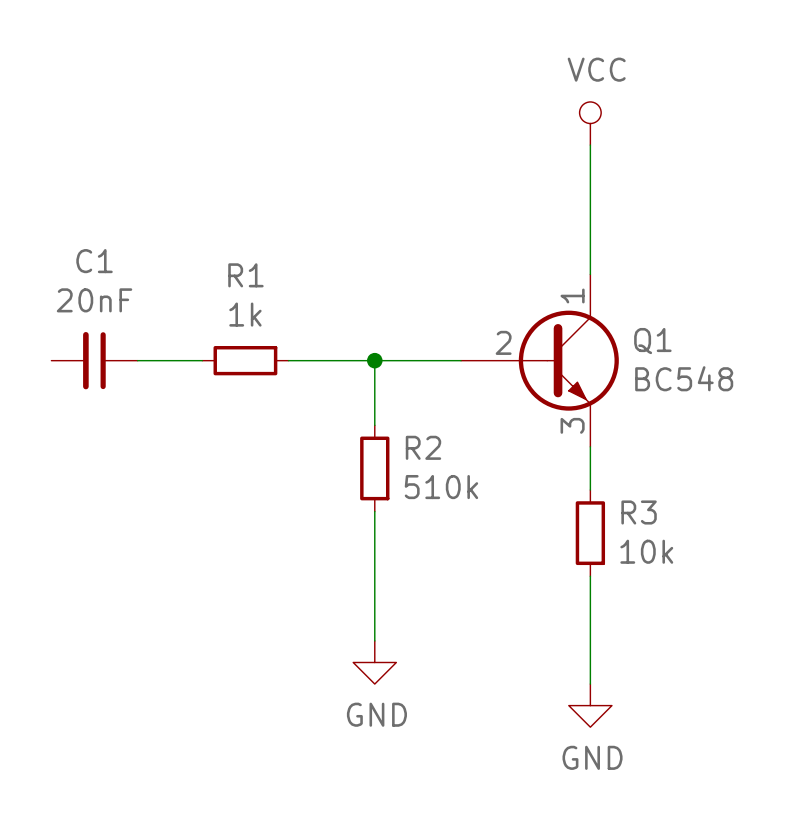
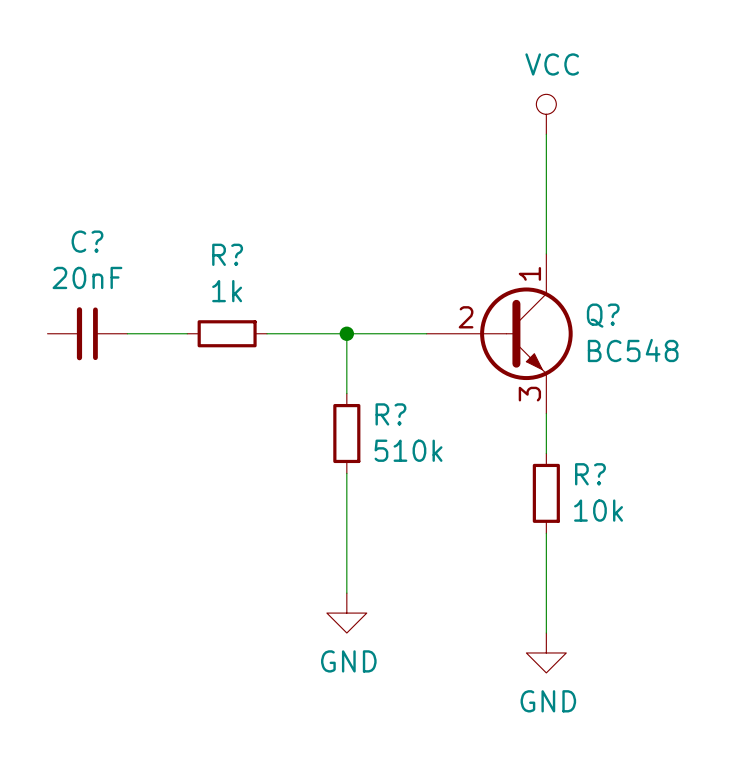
C1 name: C1 (94, 261) -> C? (87, 241)
R1 name: R1 (245, 275) -> R? (227, 254)
Q1 name: Q1 (652, 341) -> Q? (603, 315)
R2 name: R2 (423, 447) -> R? (390, 414)
R3 name: R3 (639, 512) -> R? (590, 474)

